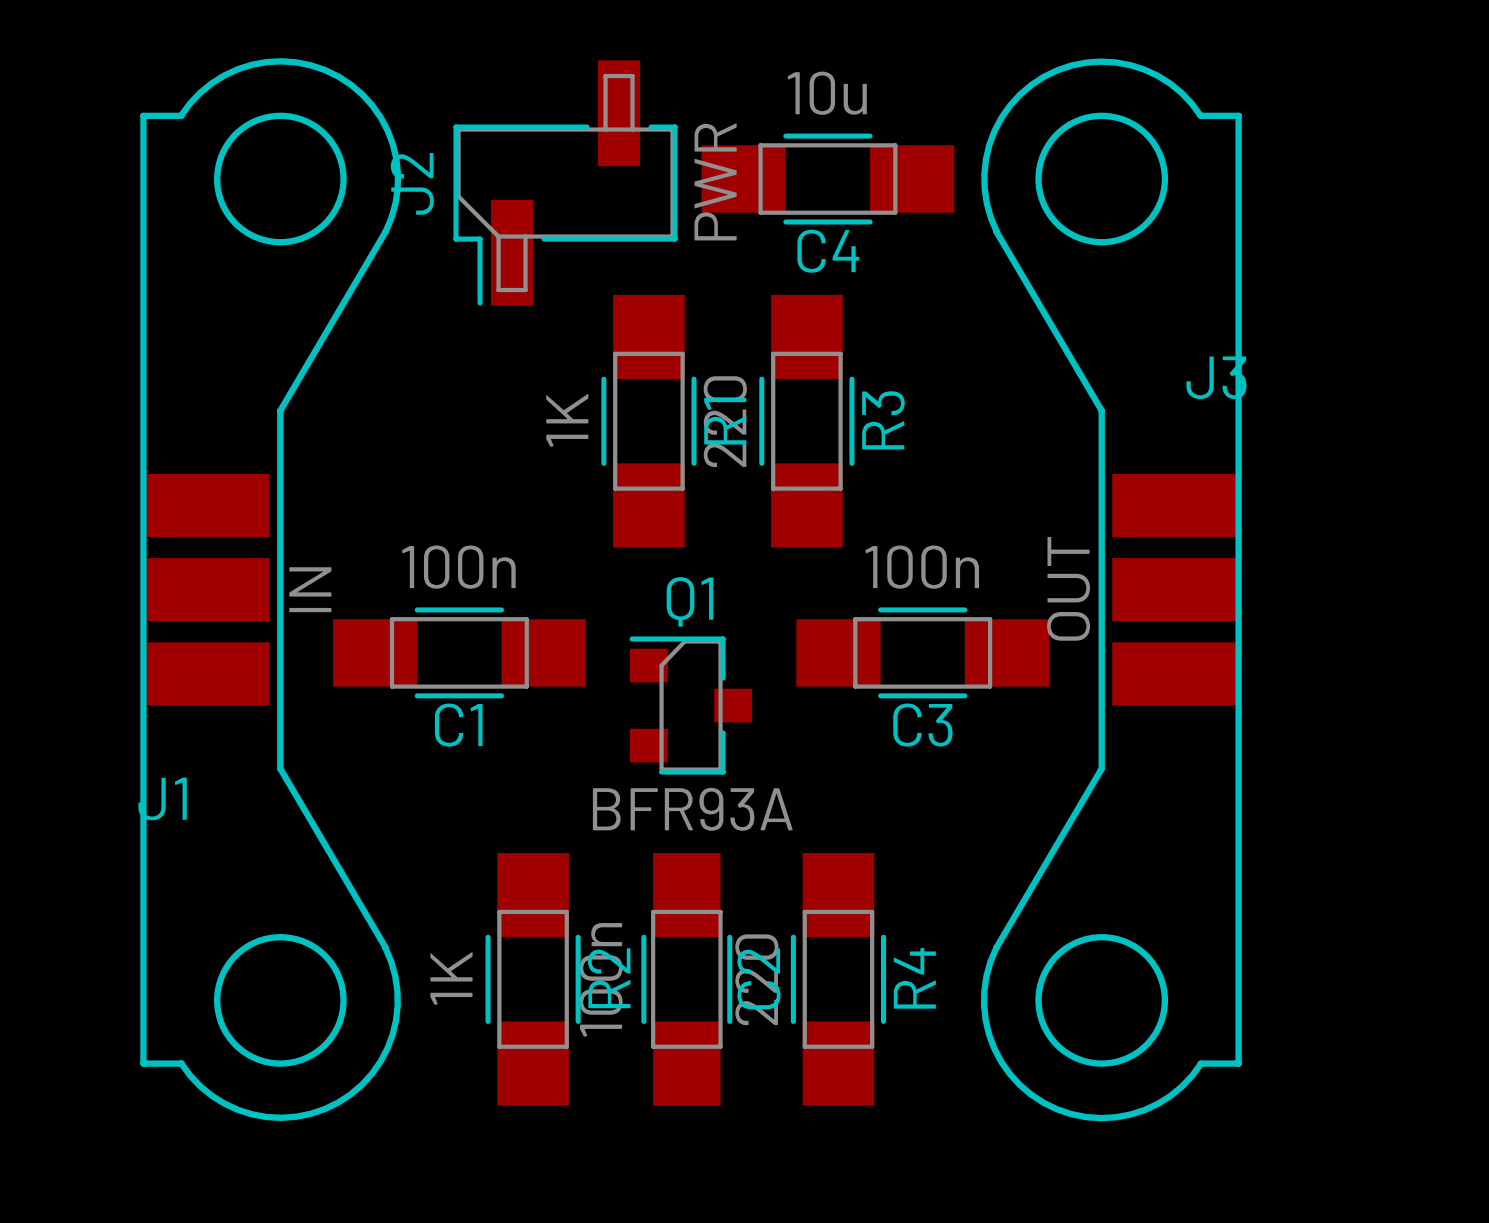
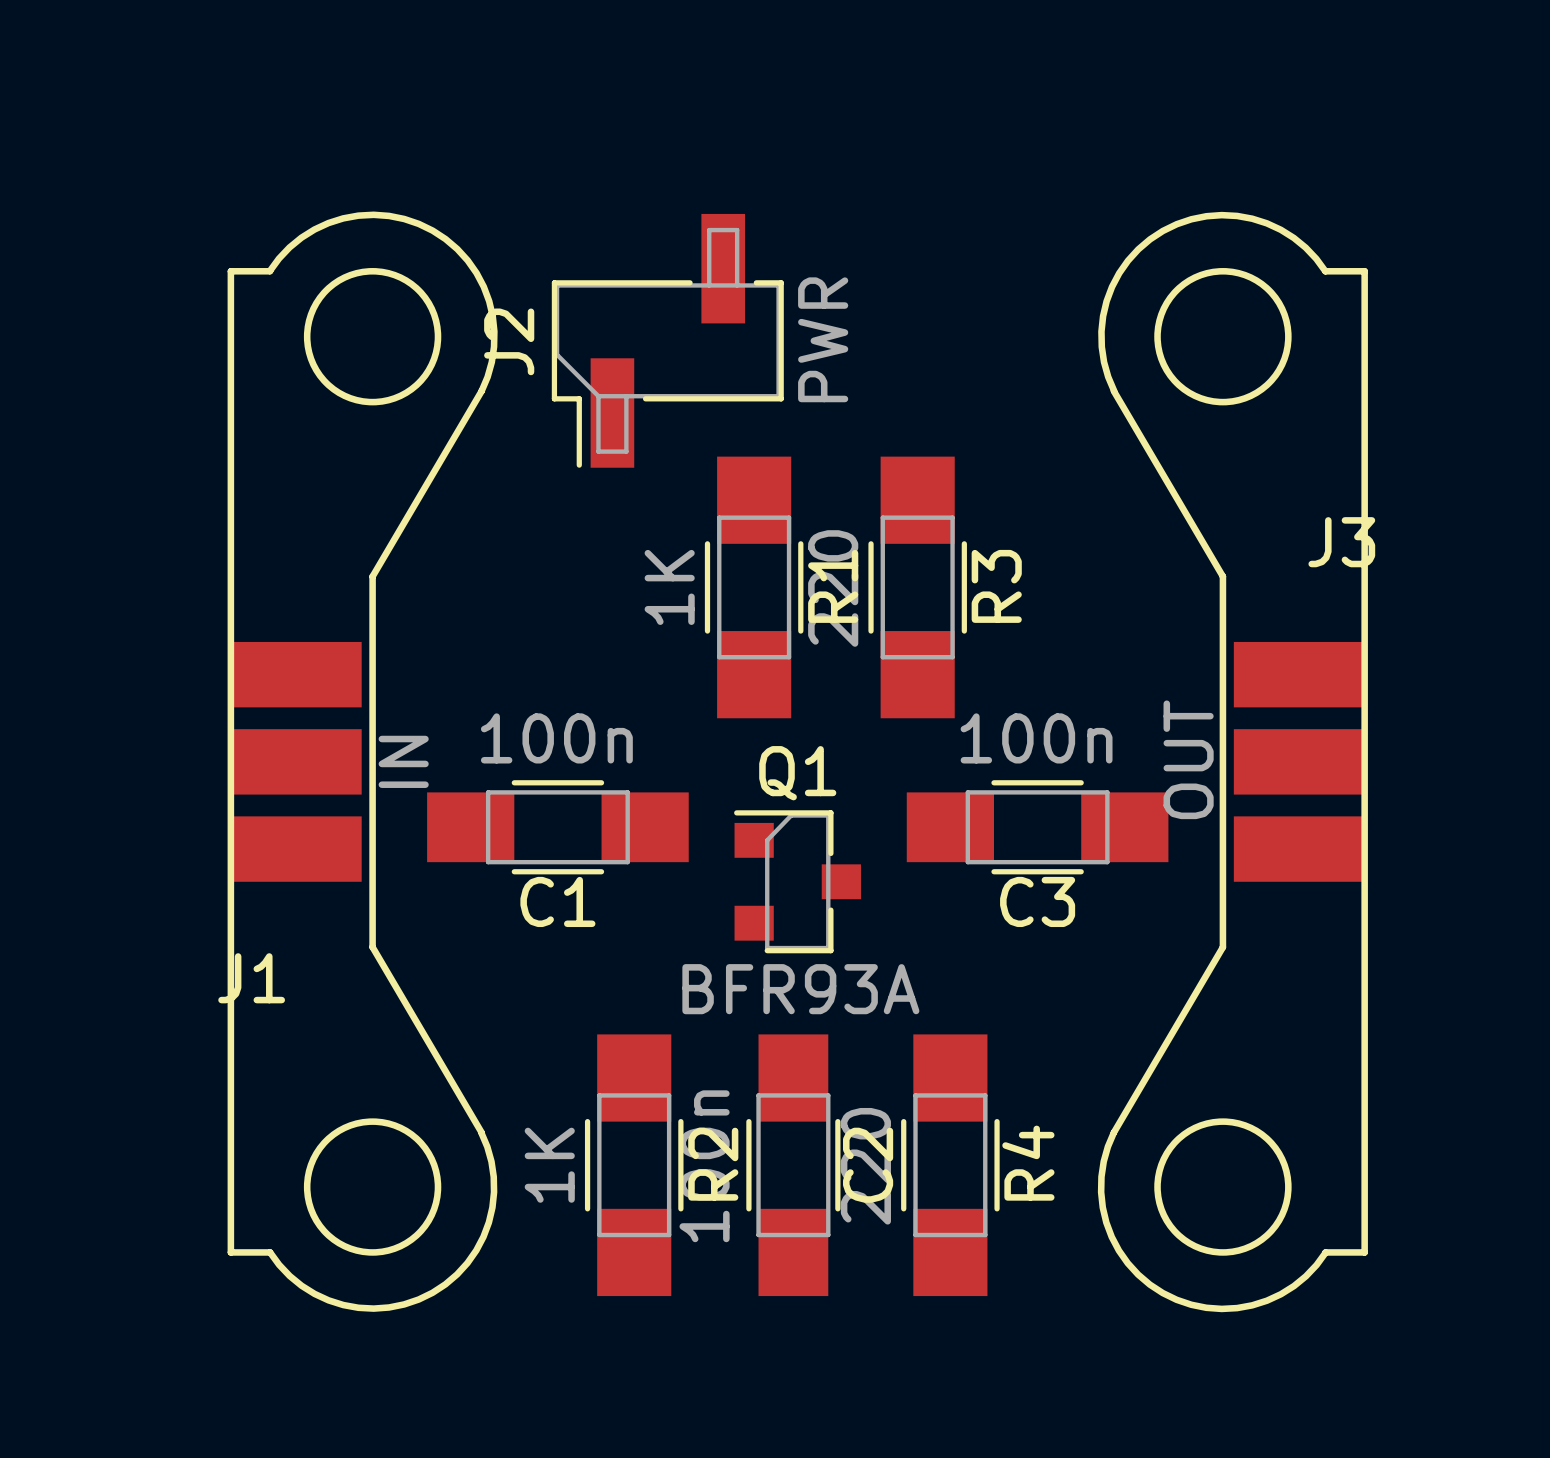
C4: 10u (827, 179) -> none

